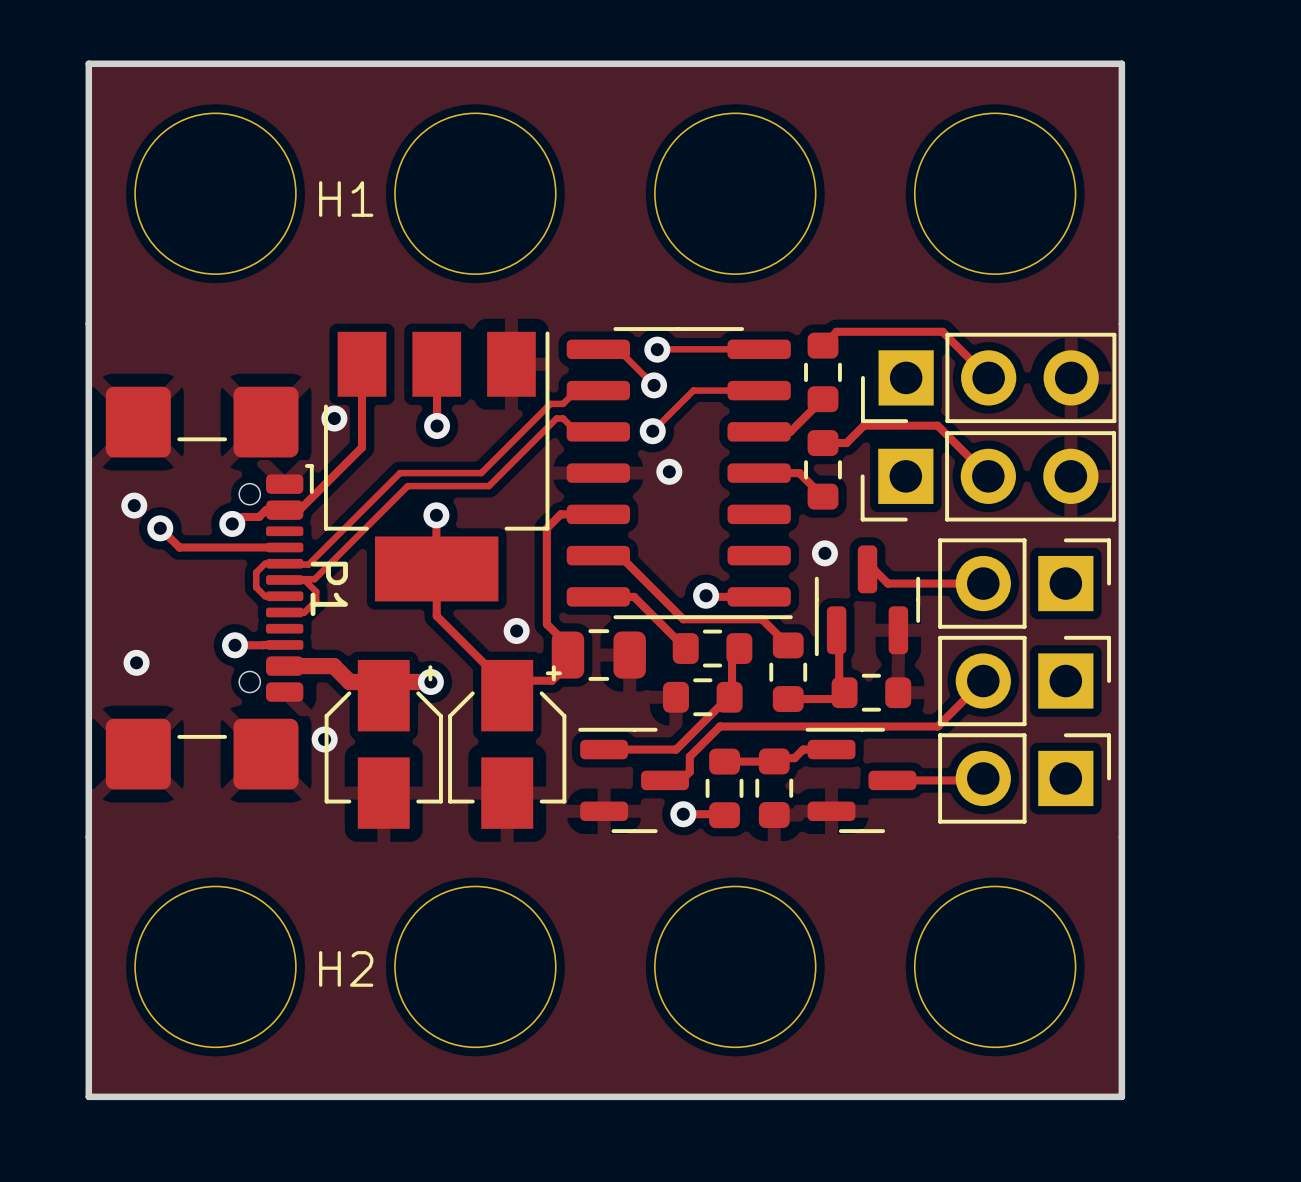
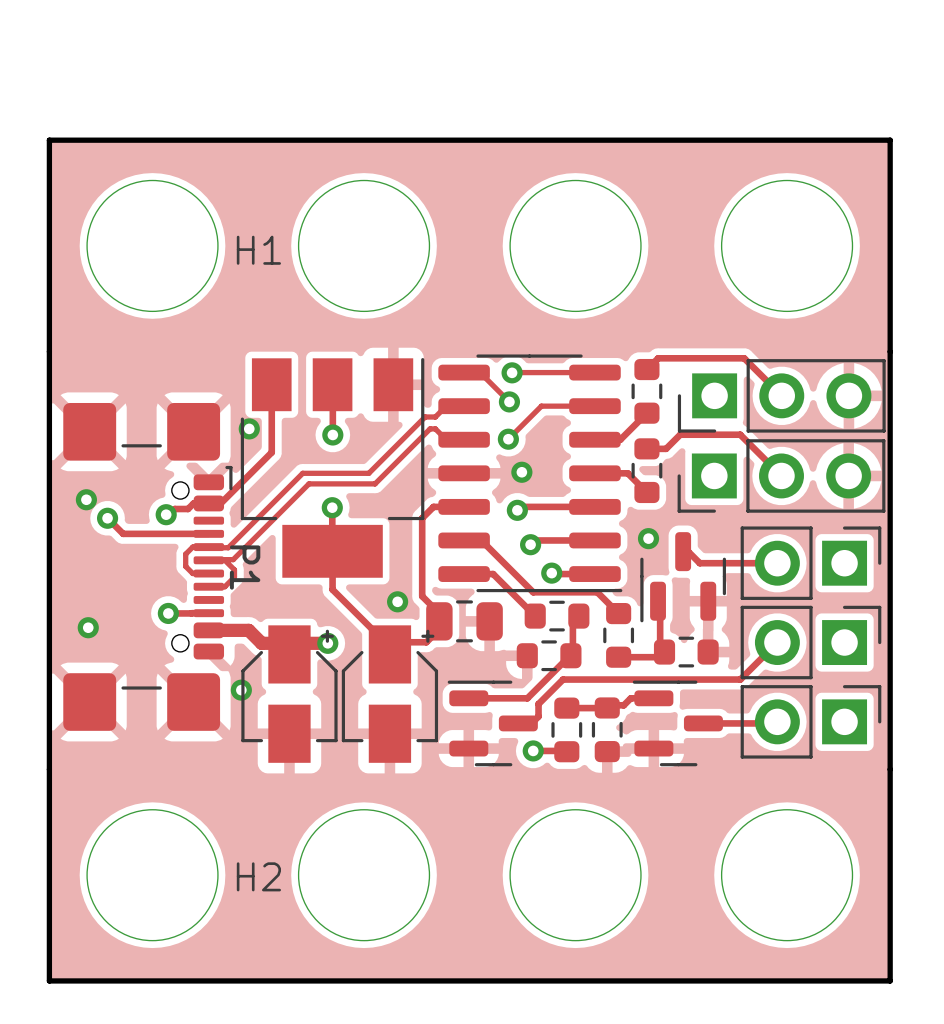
track: none -> (594, 506) (520, 506) (517, 510)
via: none -> (517, 510)
track: none -> (594, 540) (534, 540) (530, 544)
via: none -> (530, 544)

